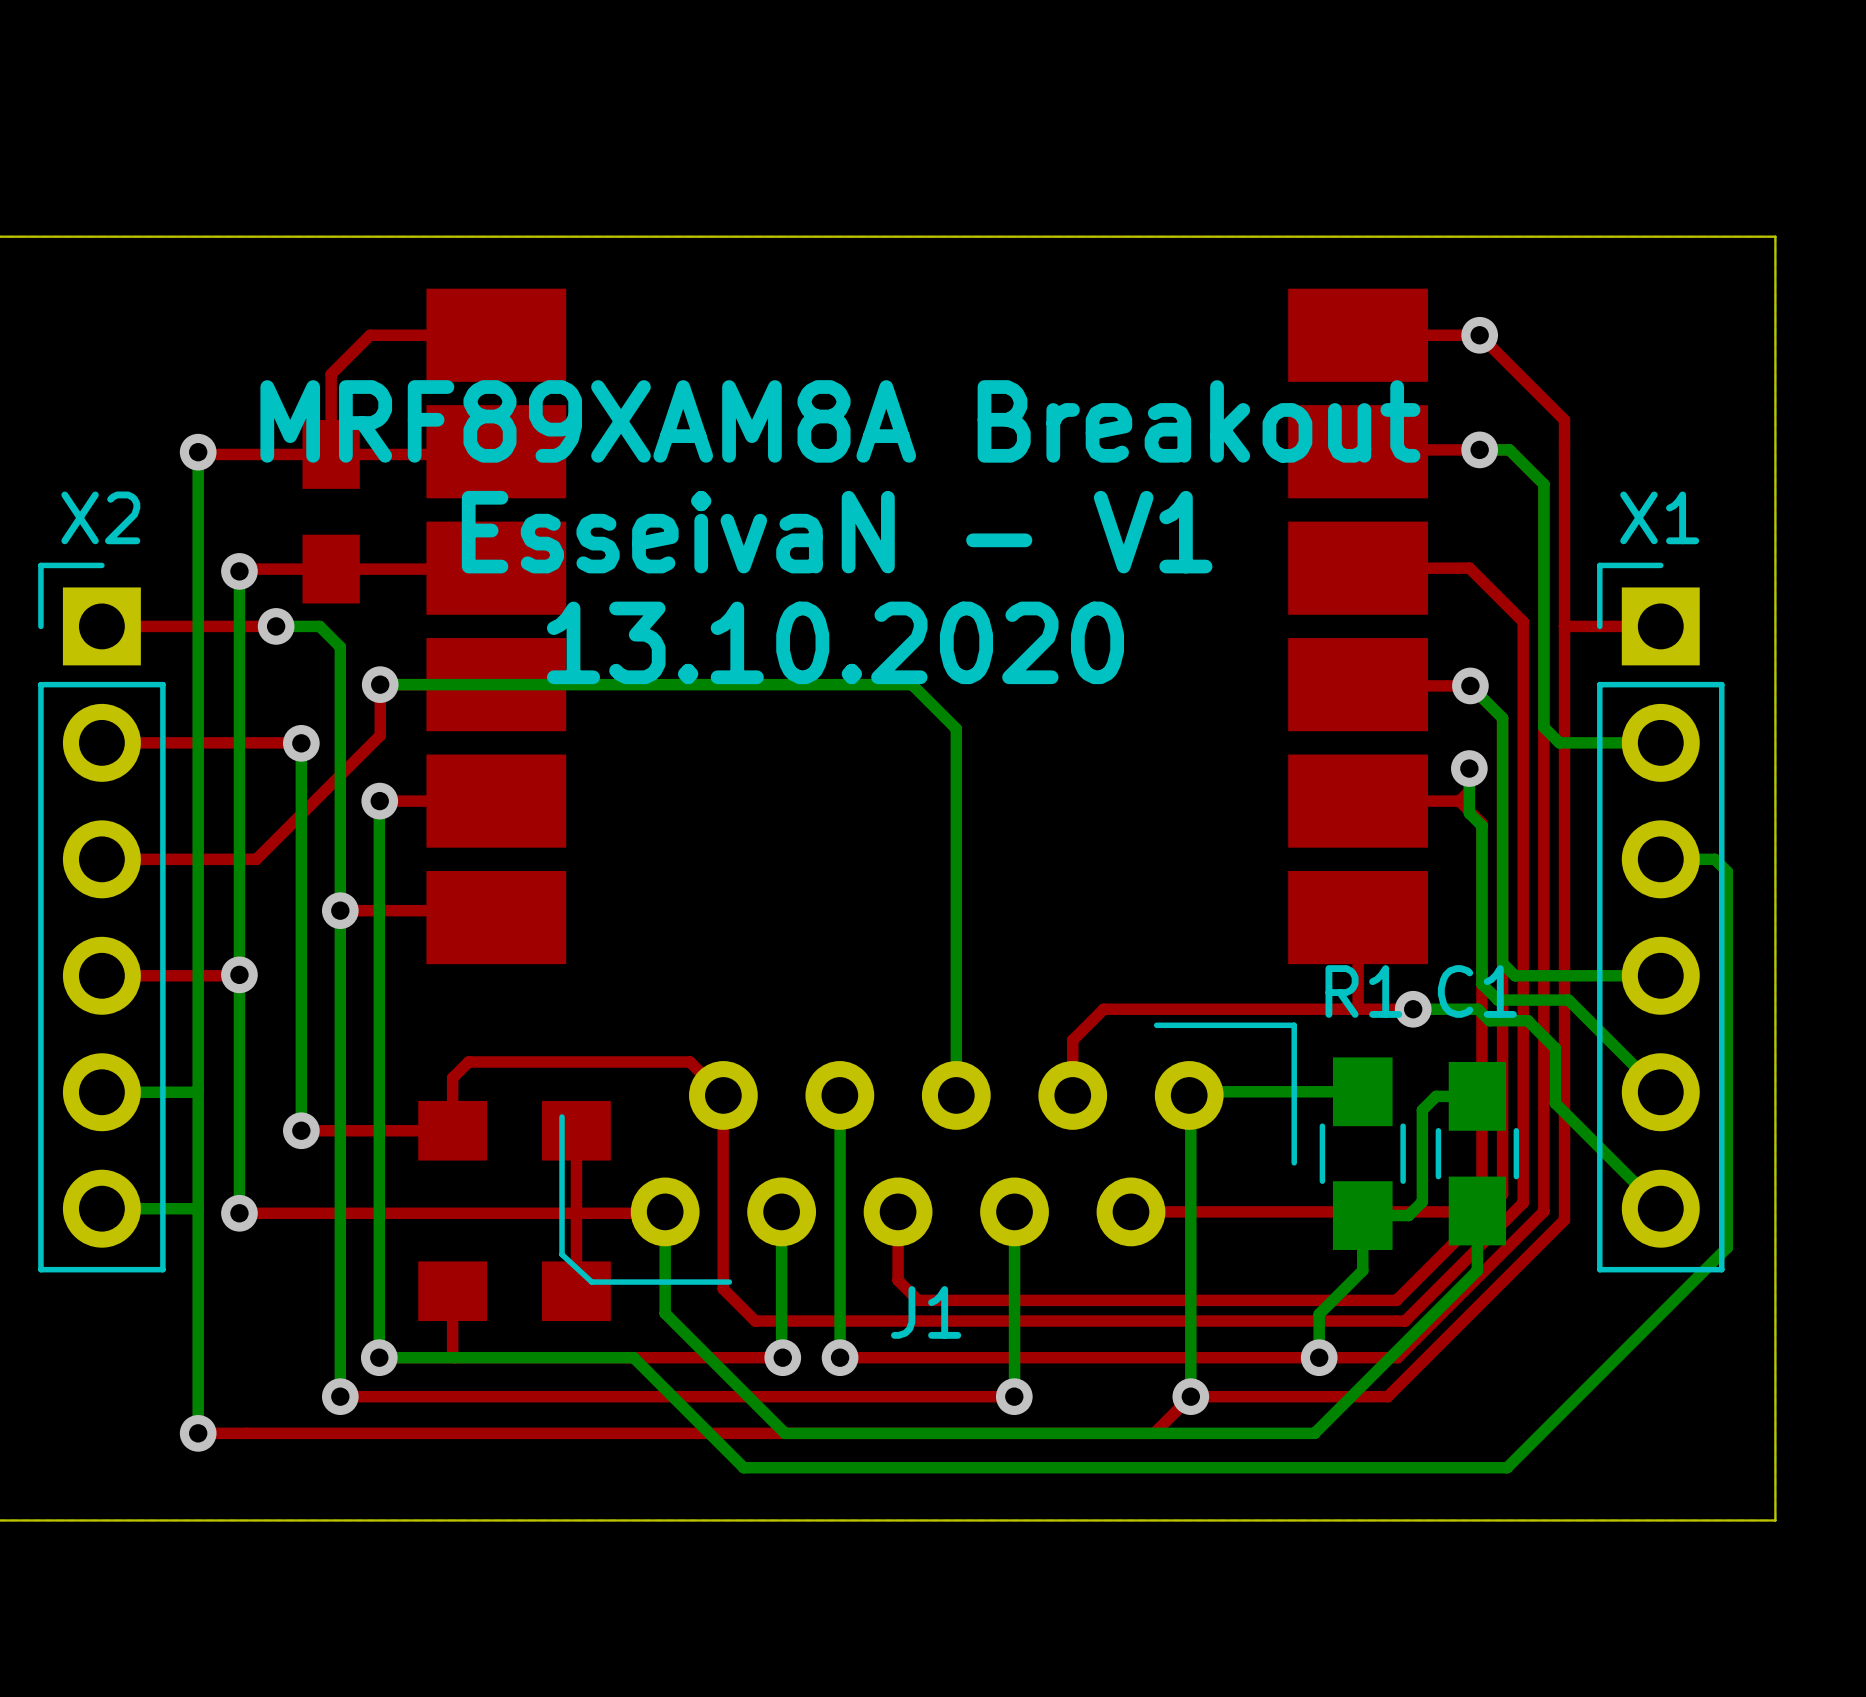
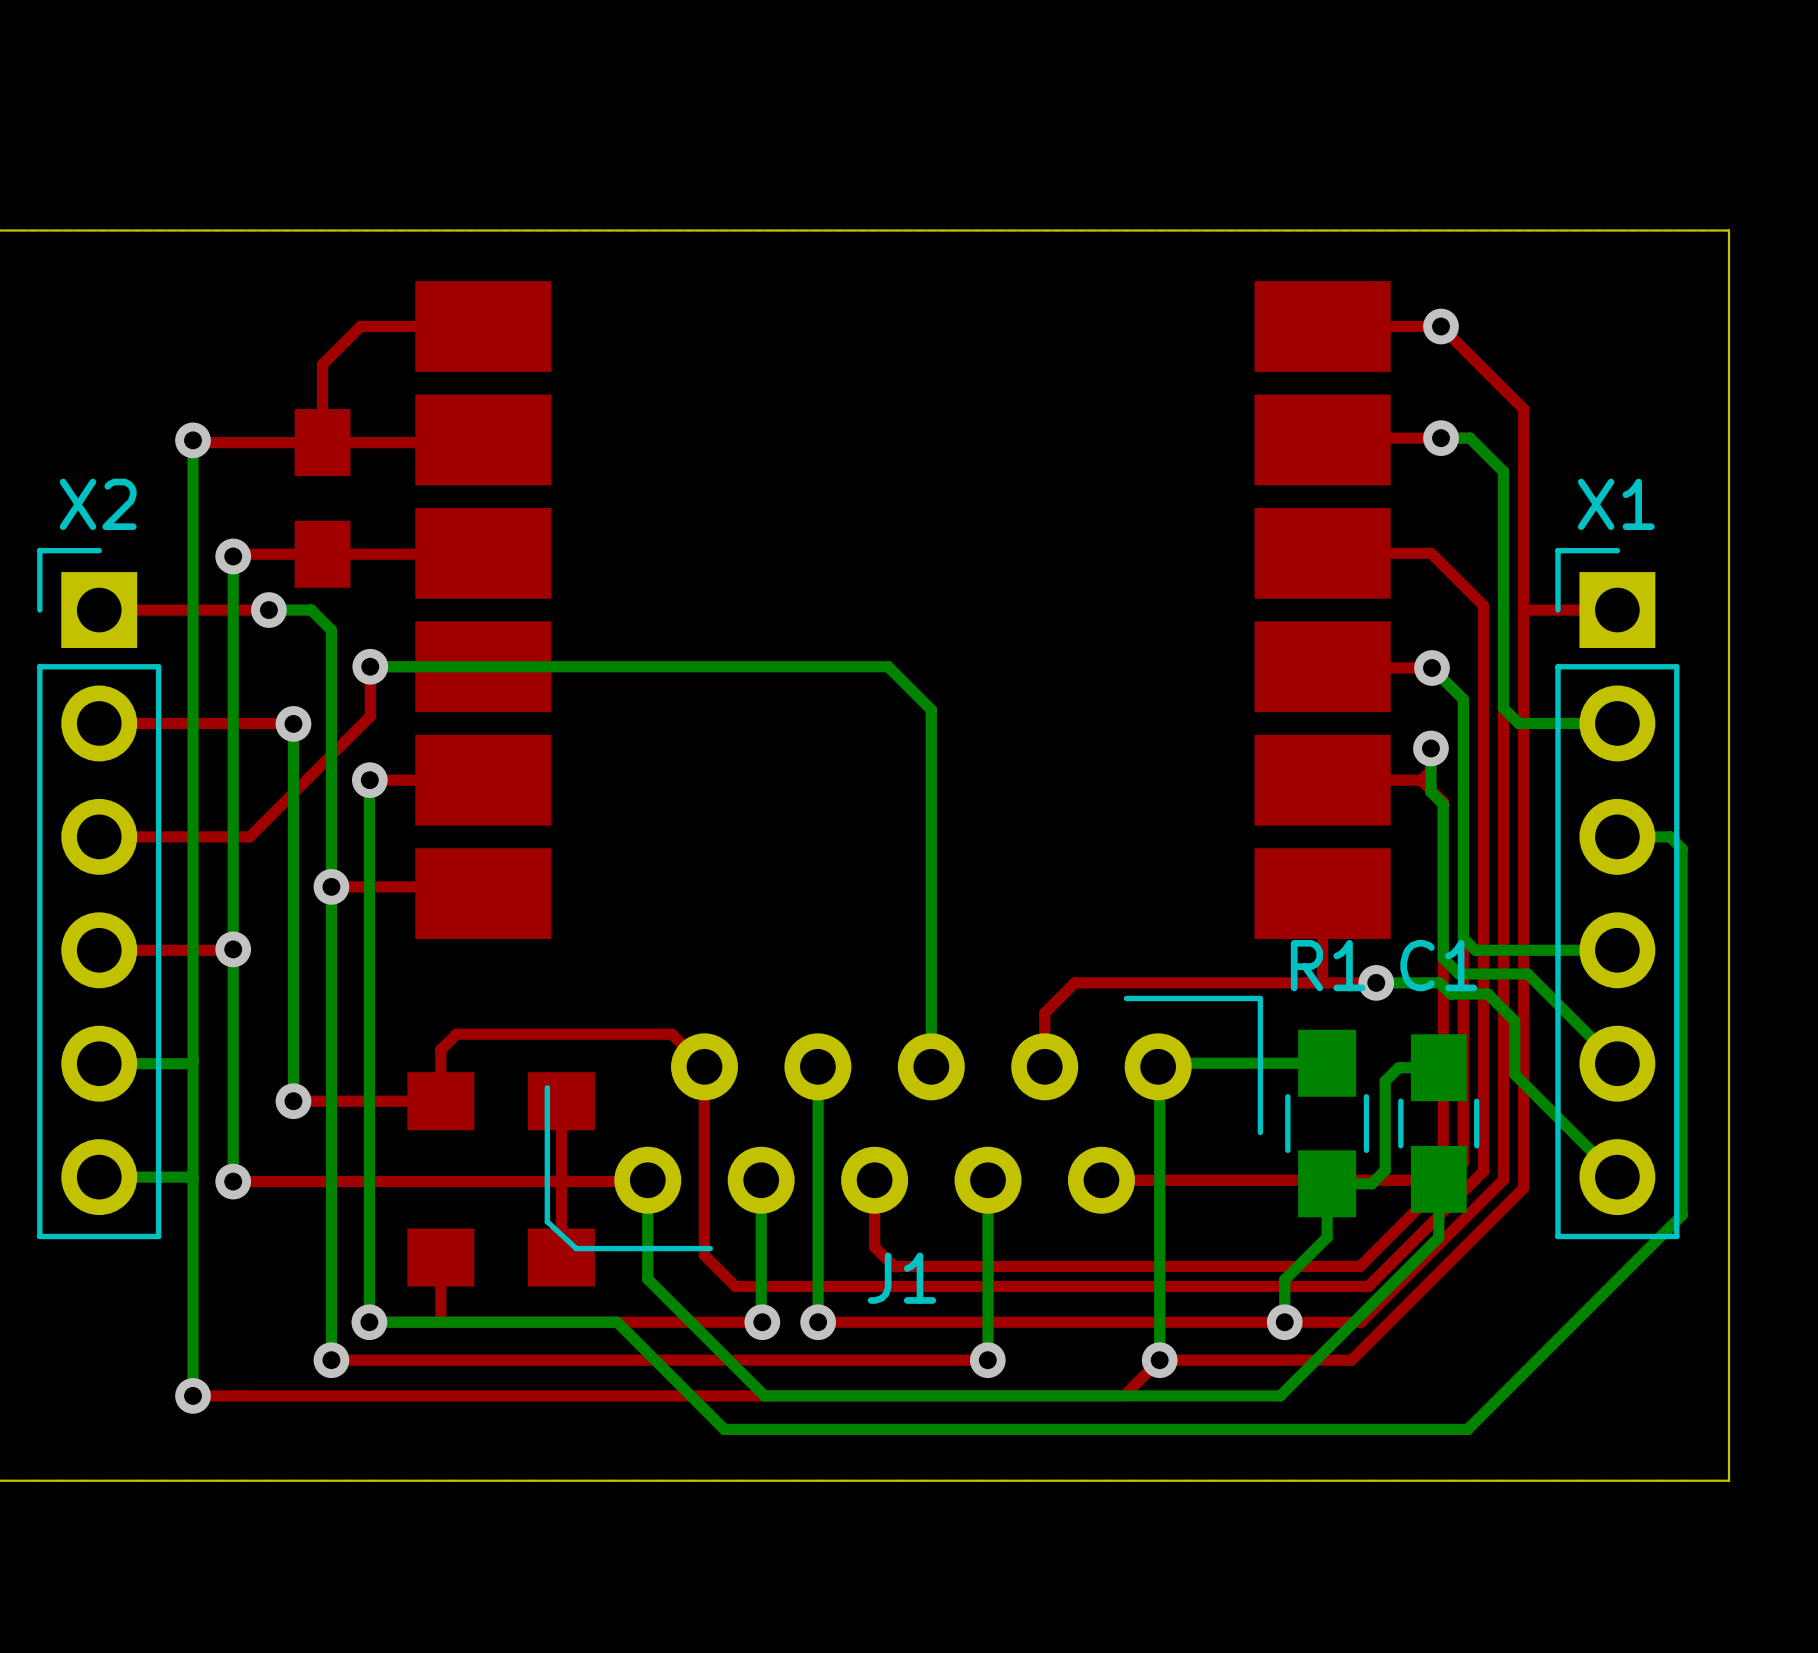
text: MRF89XAM8A Breakout (840, 421) -> none
text: EsseivaN - V1 (837, 532) -> none
text: 13.10.2020 (835, 642) -> none

